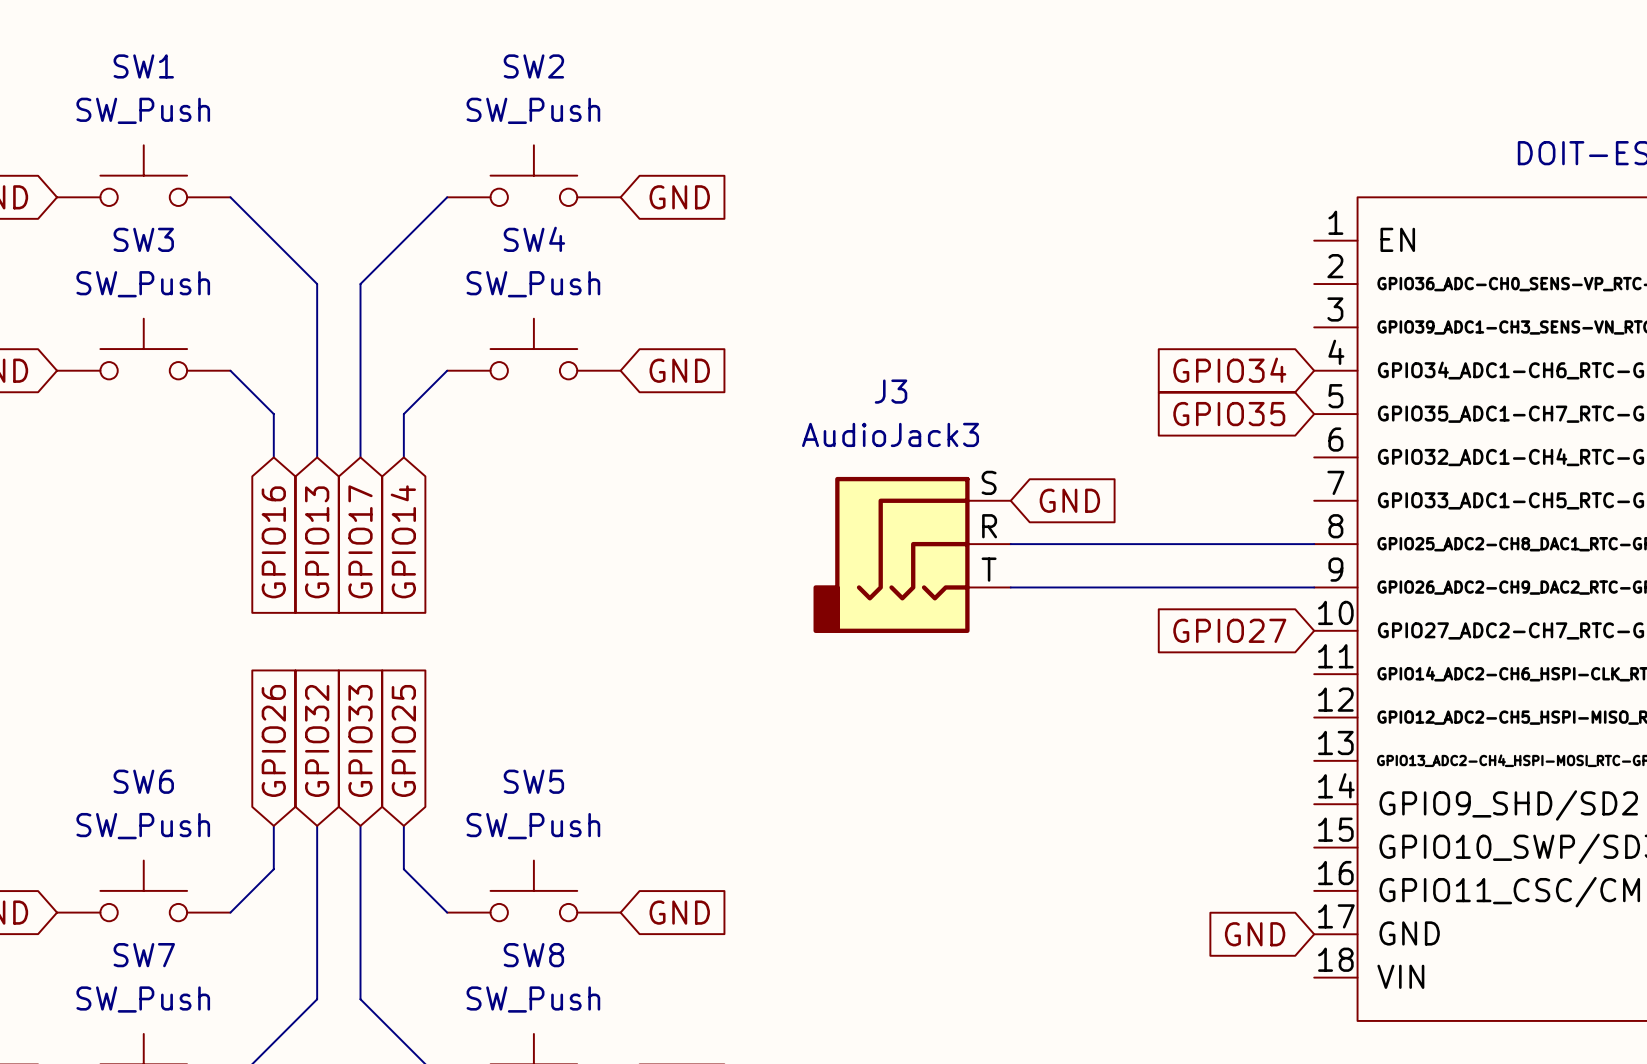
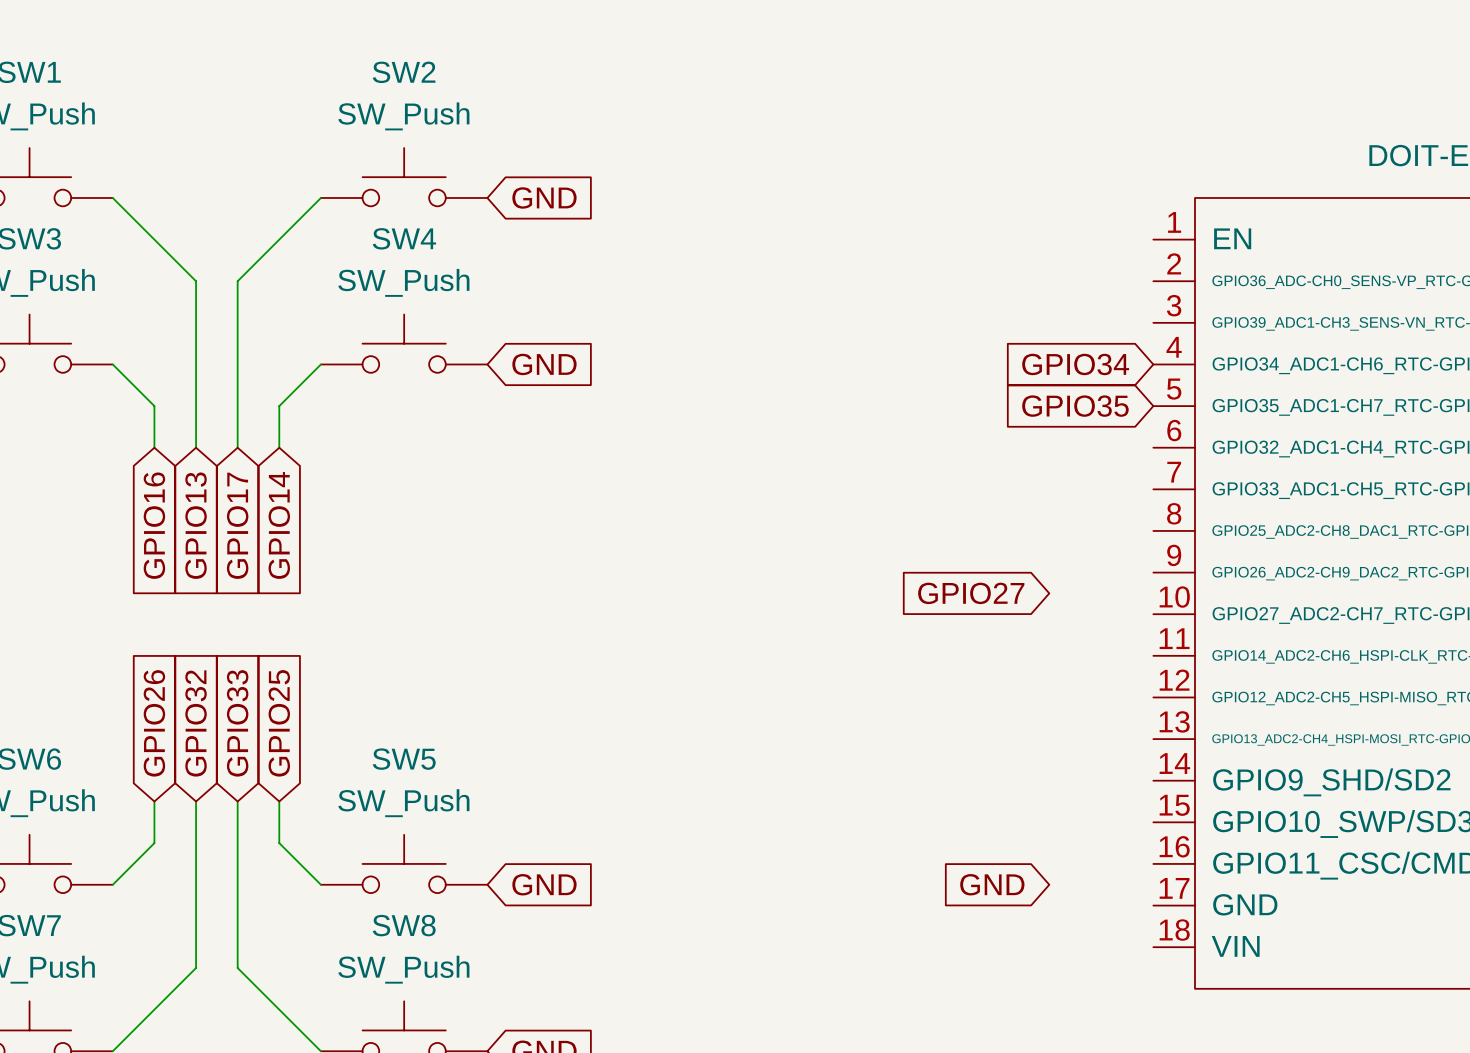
global label: GND (1069, 500) -> none
wire: (1010, 544) (1314, 544) -> none
J3: AudioJack3 (912, 554) -> none
wire: (1010, 587) (1314, 587) -> none
global label position: GPIO27 (1229, 630) -> GPIO27 (971, 593)
global label position: GND (1255, 934) -> GND (992, 884)

